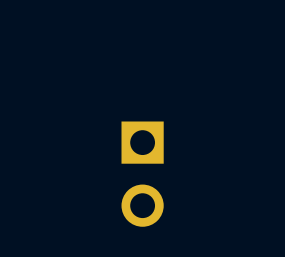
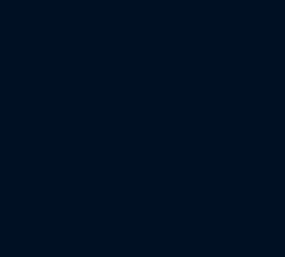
part: (142, 174) -> none

